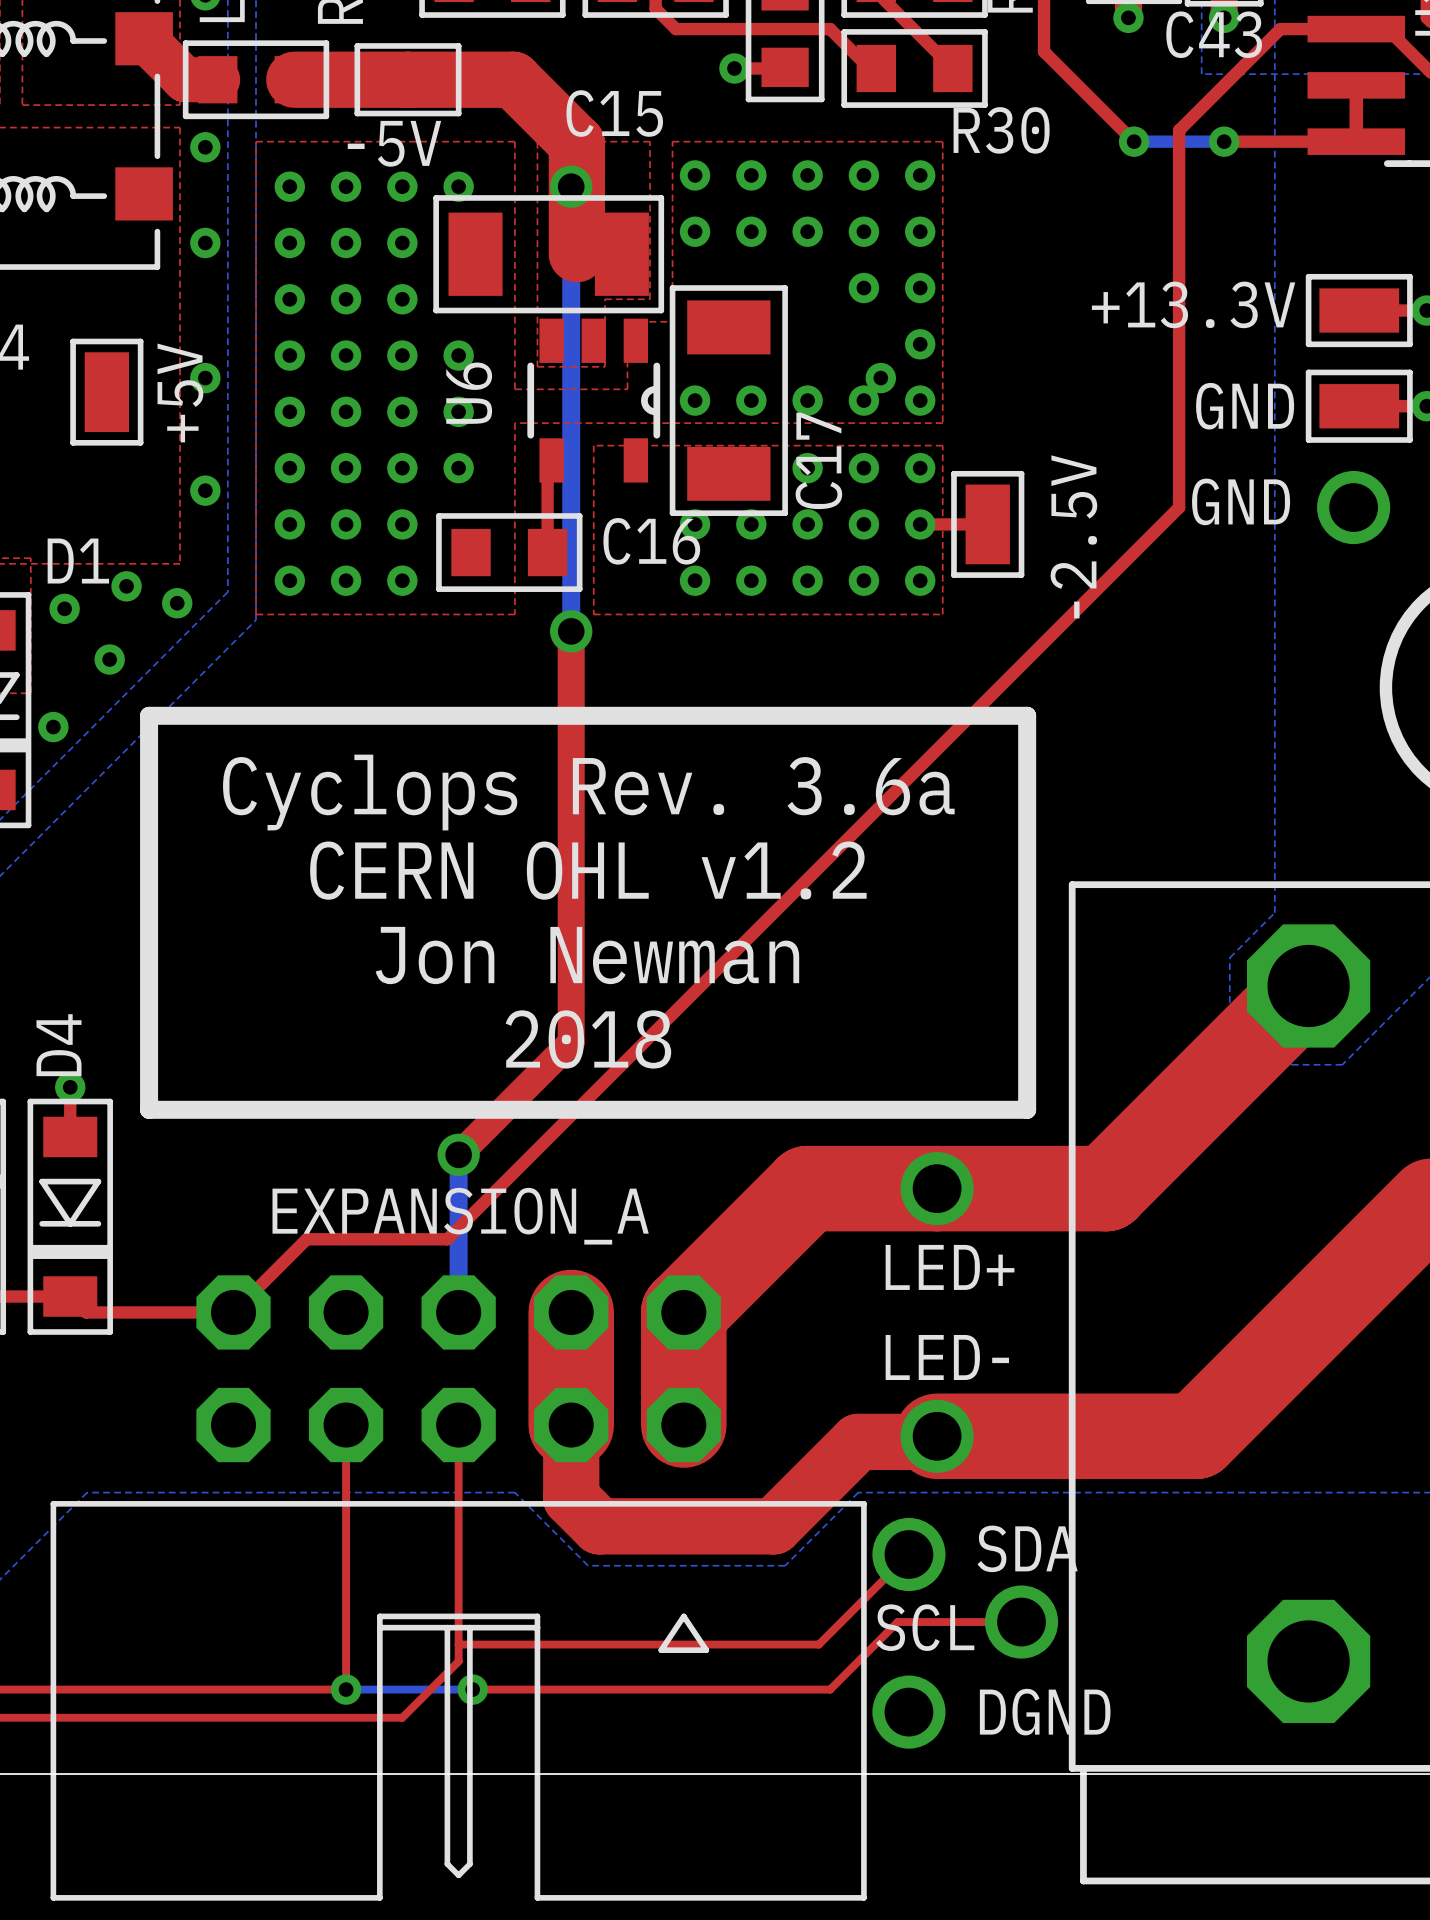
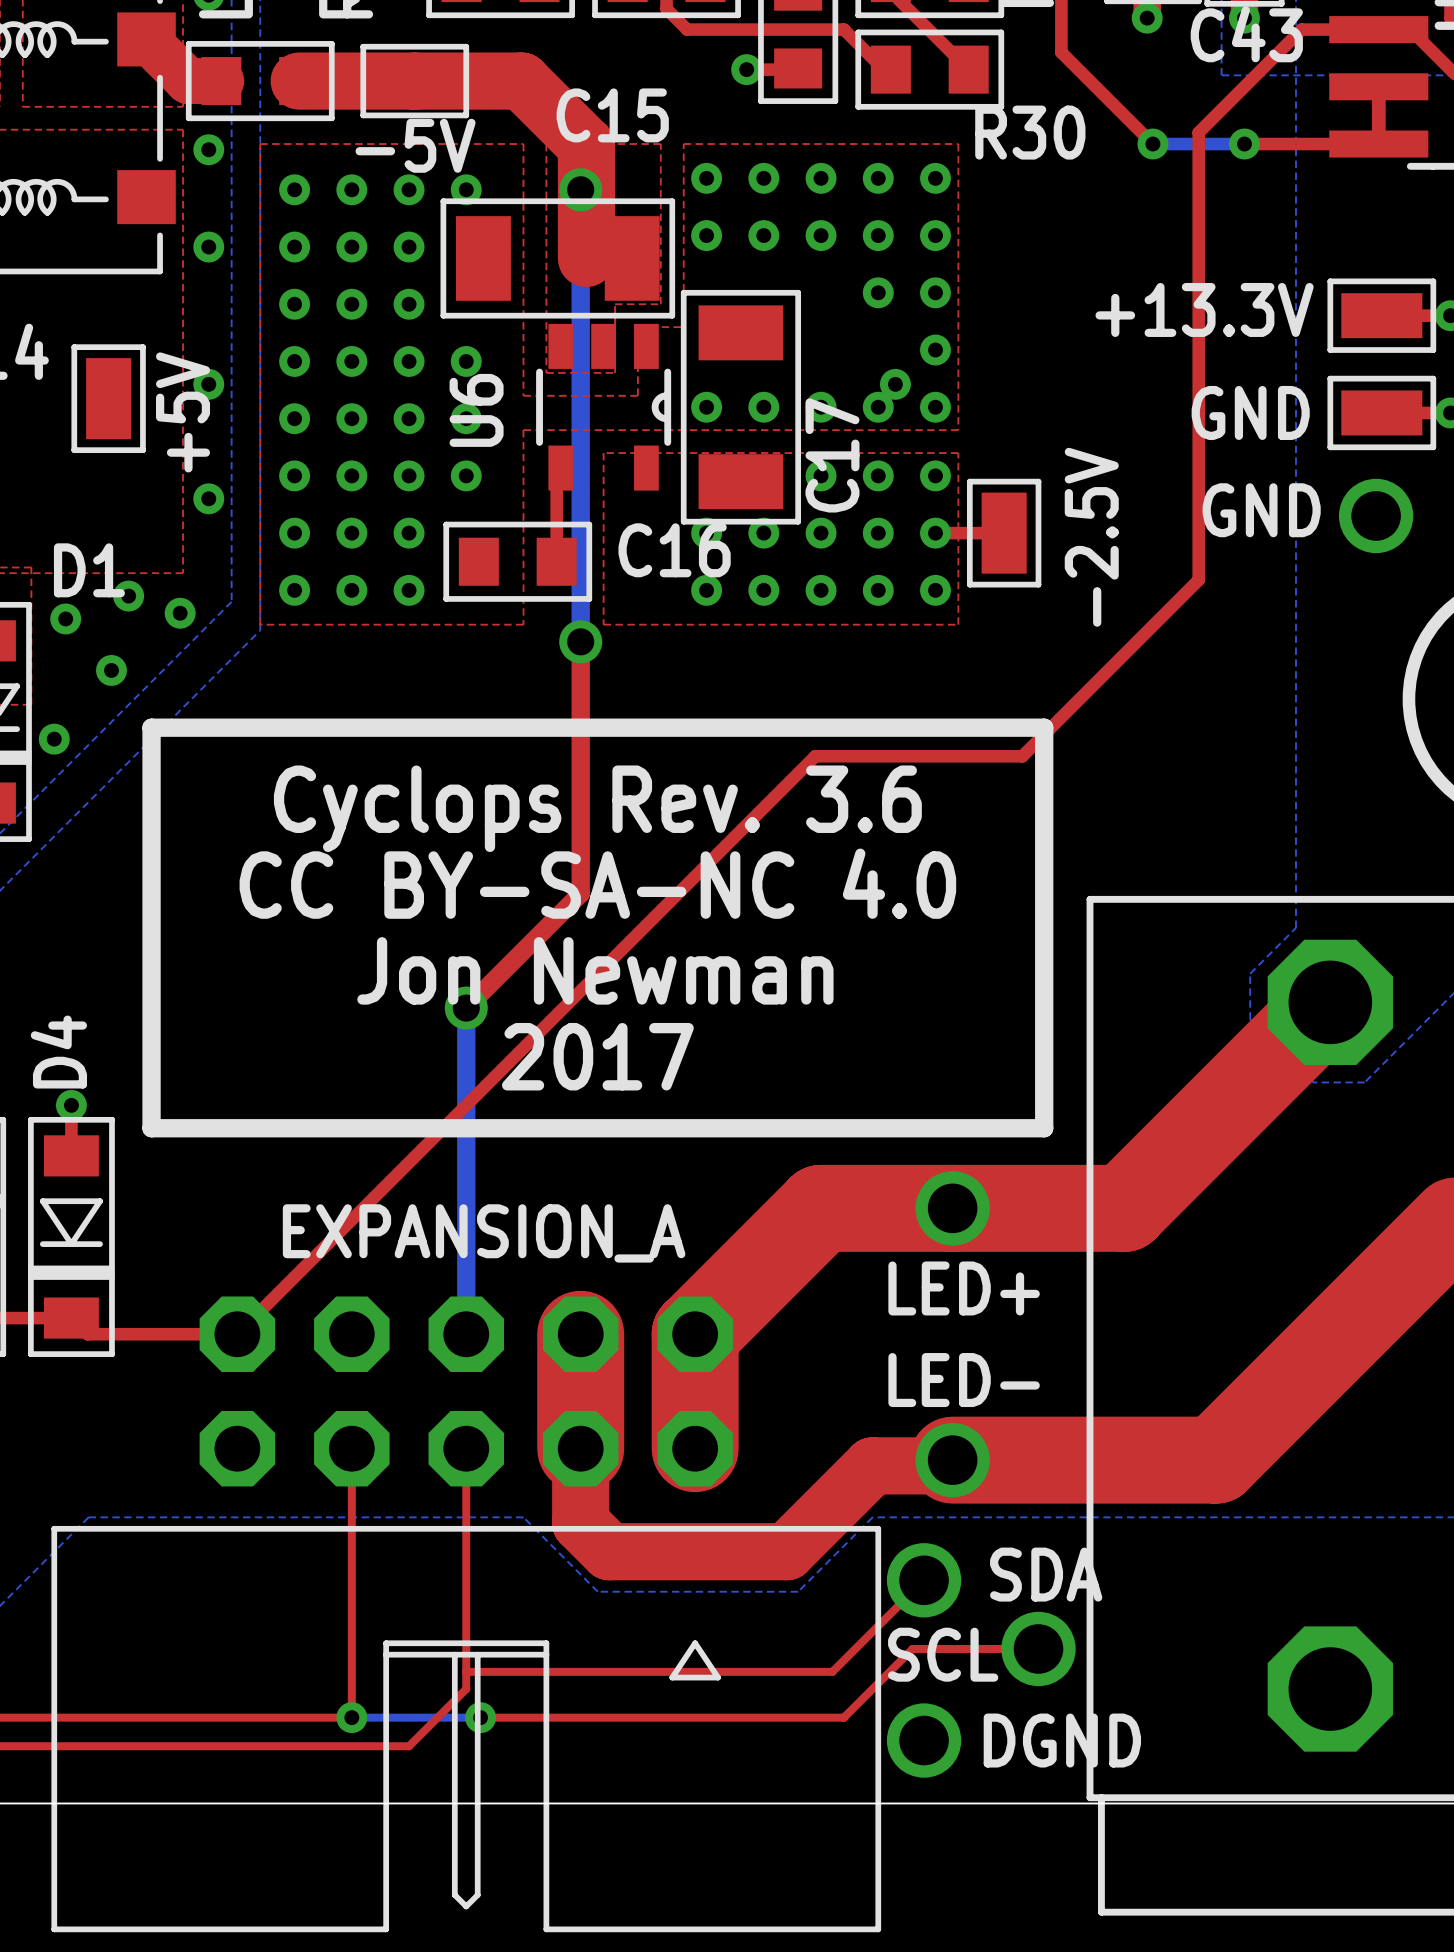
top track: (1179, 507) (447, 1239) (306, 1239) -> (1198, 515) (1198, 580) (1022, 756) (815, 756) (311, 1259)
top track width: thick (571, 631) (571, 879) -> thin (580, 641) (580, 893)
text: Cyclops Rev. 3.6a (588, 792) -> Cyclops Rev. 3.6 (597, 808)
text: CERN OHL v1.2 (588, 870) -> CC BY-SA-NC 4.0 (597, 883)
top track: (571, 879) (571, 1042) (458, 1154) -> (580, 893) (466, 1008)
bottom track: none -> (466, 1008) (466, 1174)
text: 2018 (588, 1039) -> 2017 (597, 1056)
via position: (458, 1154) -> (466, 1008)

